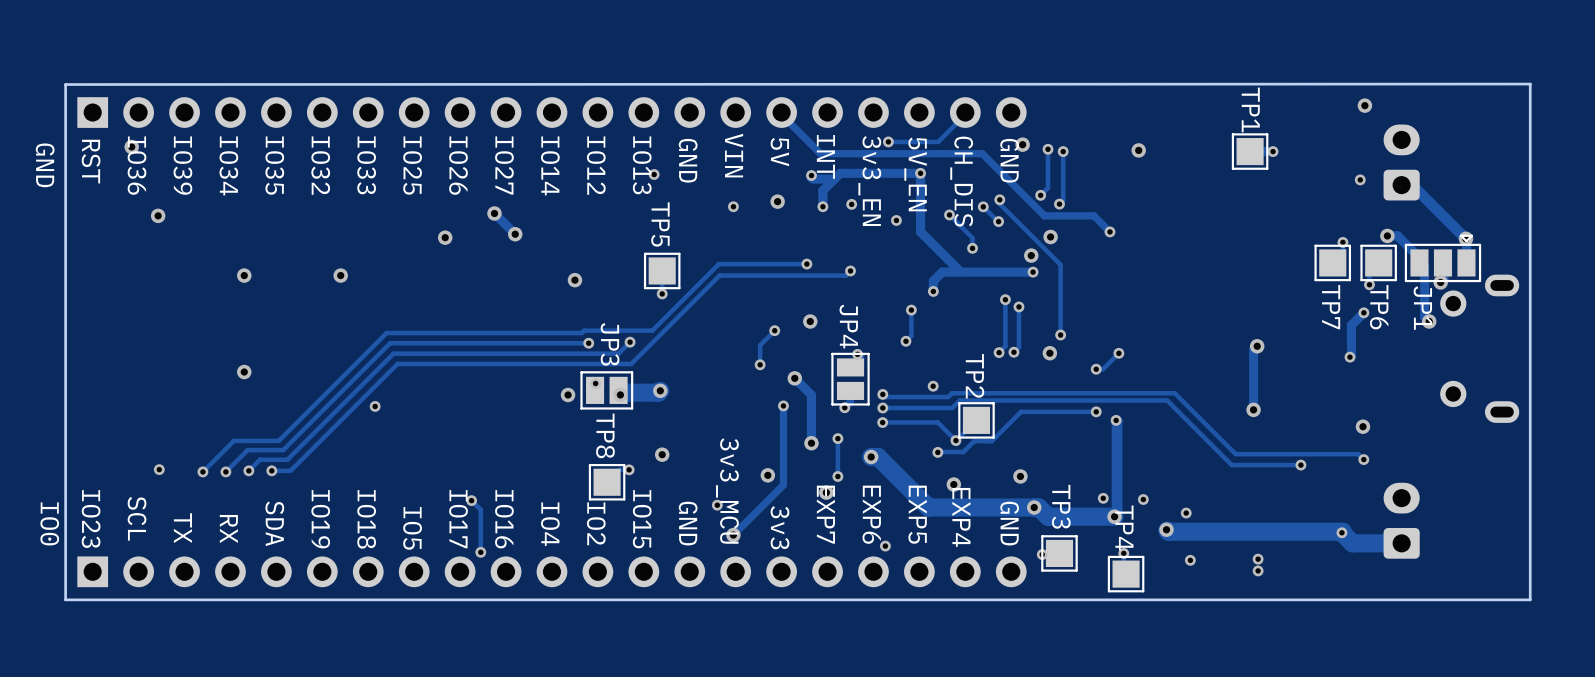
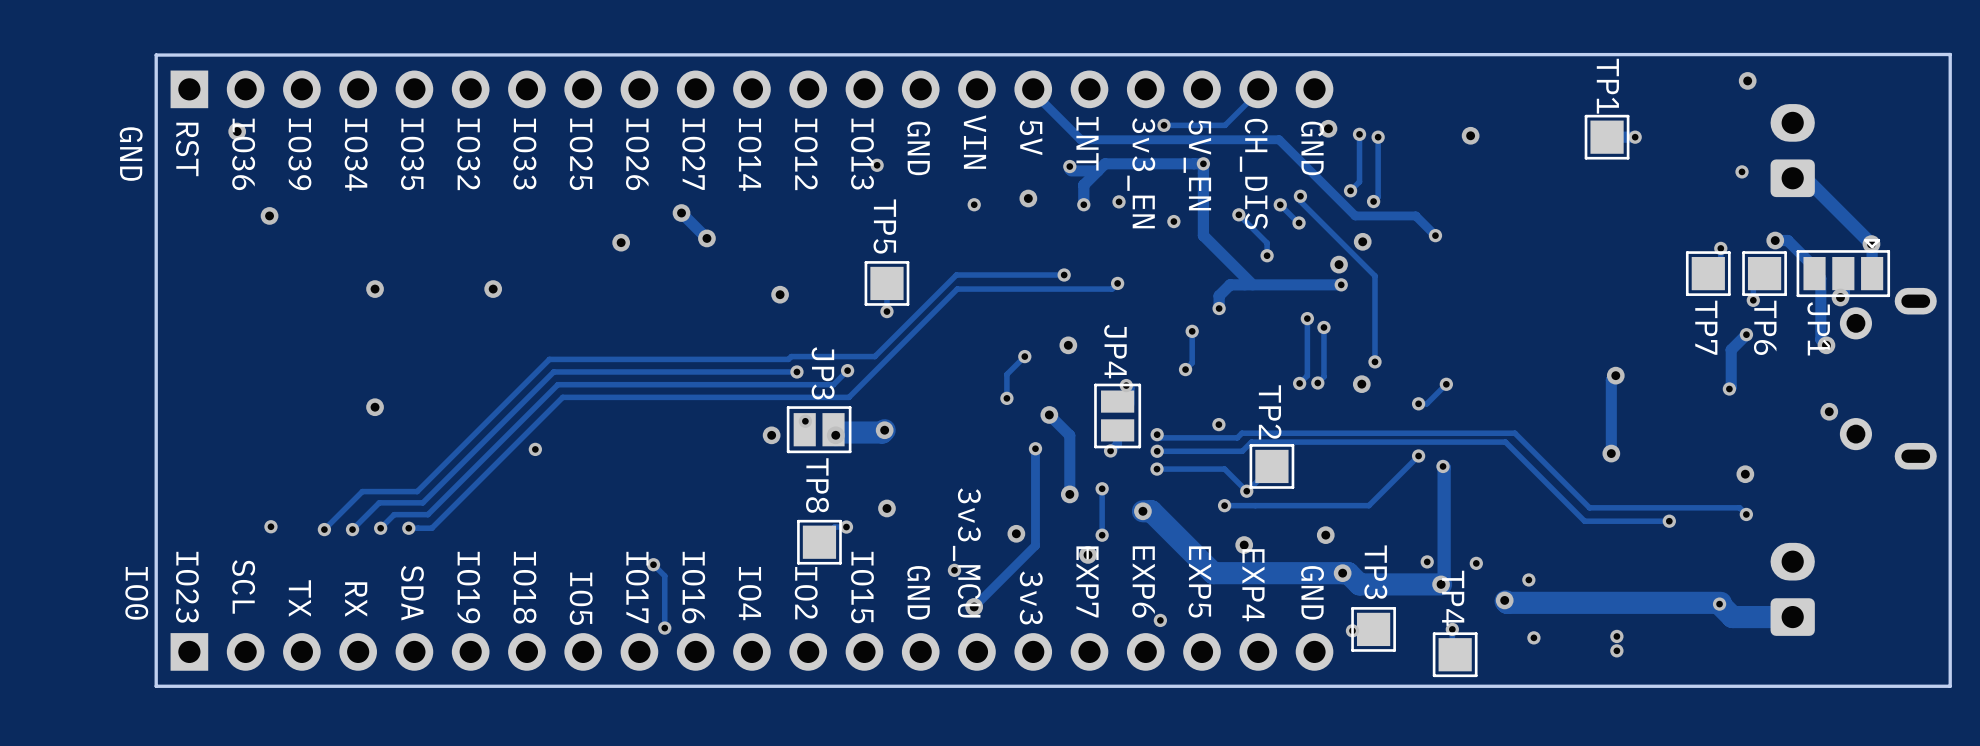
via: none -> (1829, 411)
track: (1096, 411) (1021, 411) (991, 441) (974, 441) (963, 452) (937, 452) -> (1418, 456) (1368, 505) (1224, 505)

